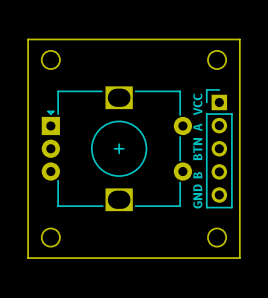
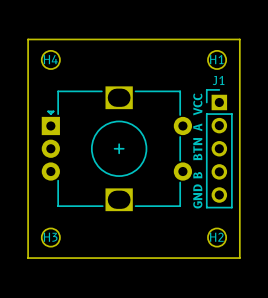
H4 name: none -> H4 (50, 59)
H1 name: none -> H1 (216, 59)
J1 name: none -> J1 (218, 80)
H3 name: none -> H3 (50, 237)
H2 name: none -> H2 (216, 237)

